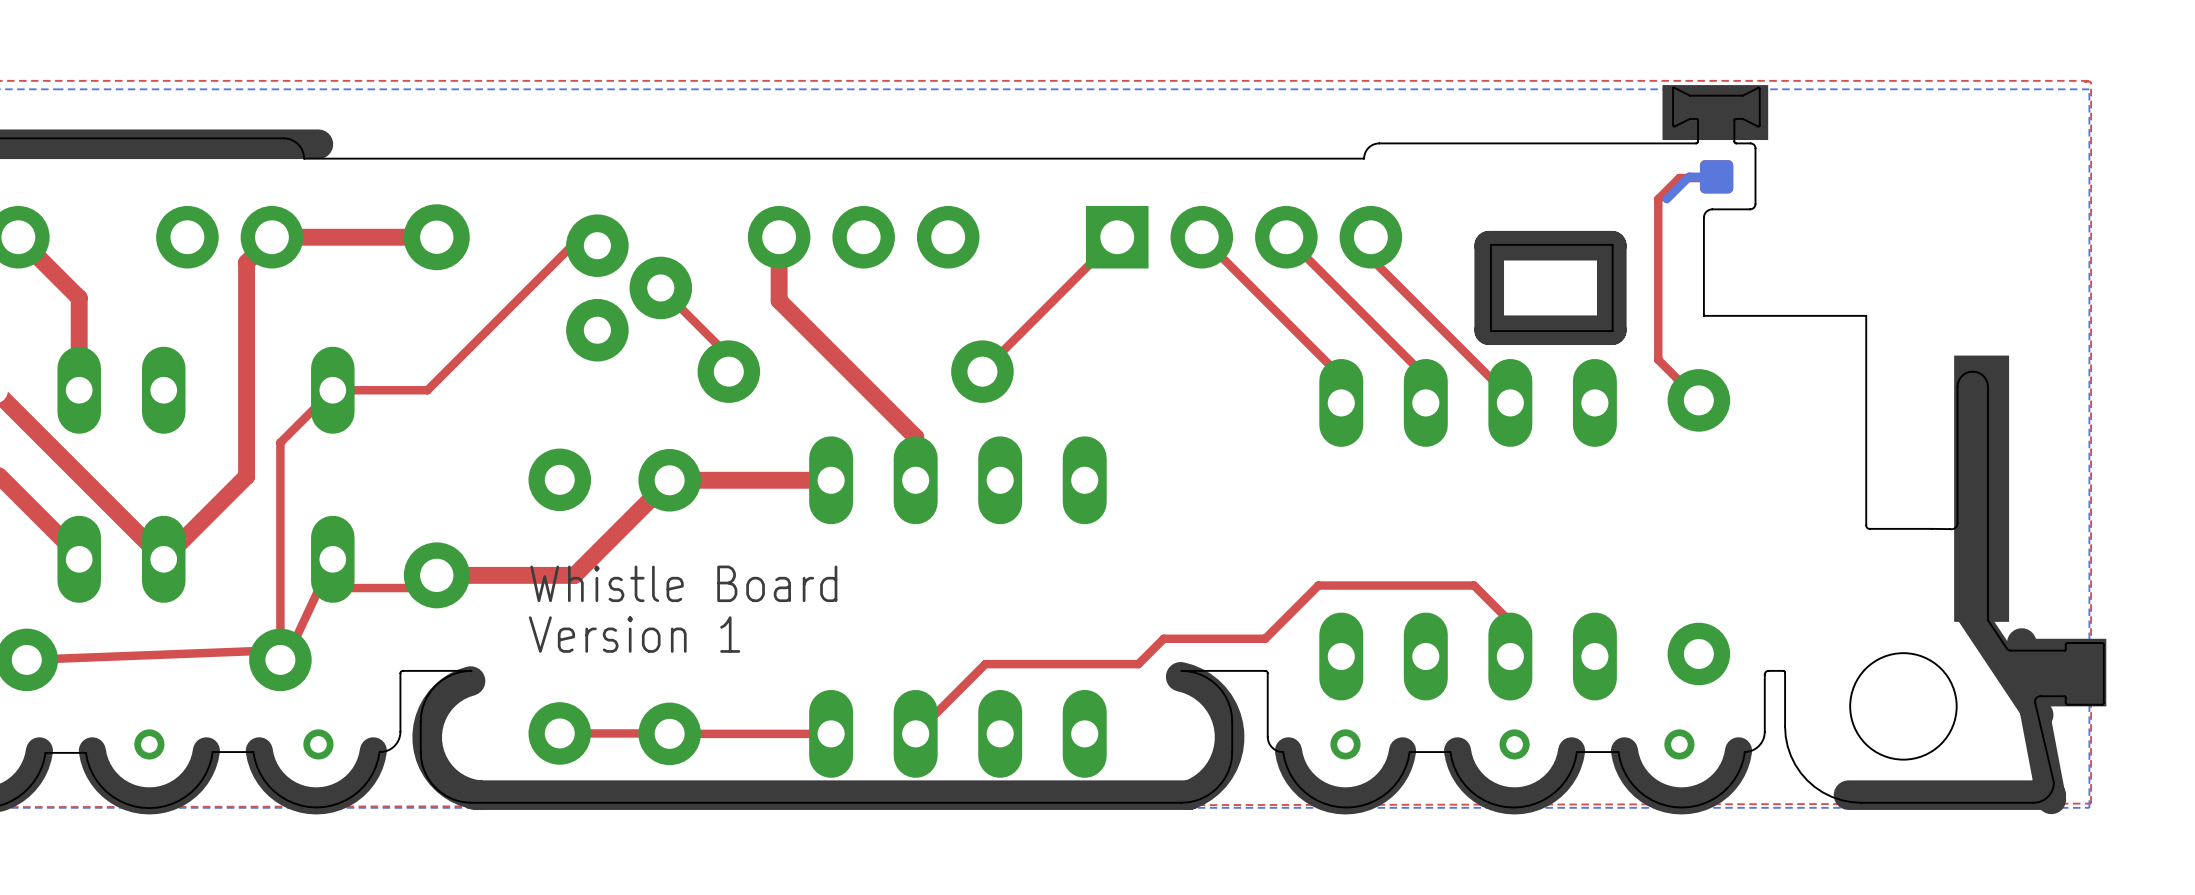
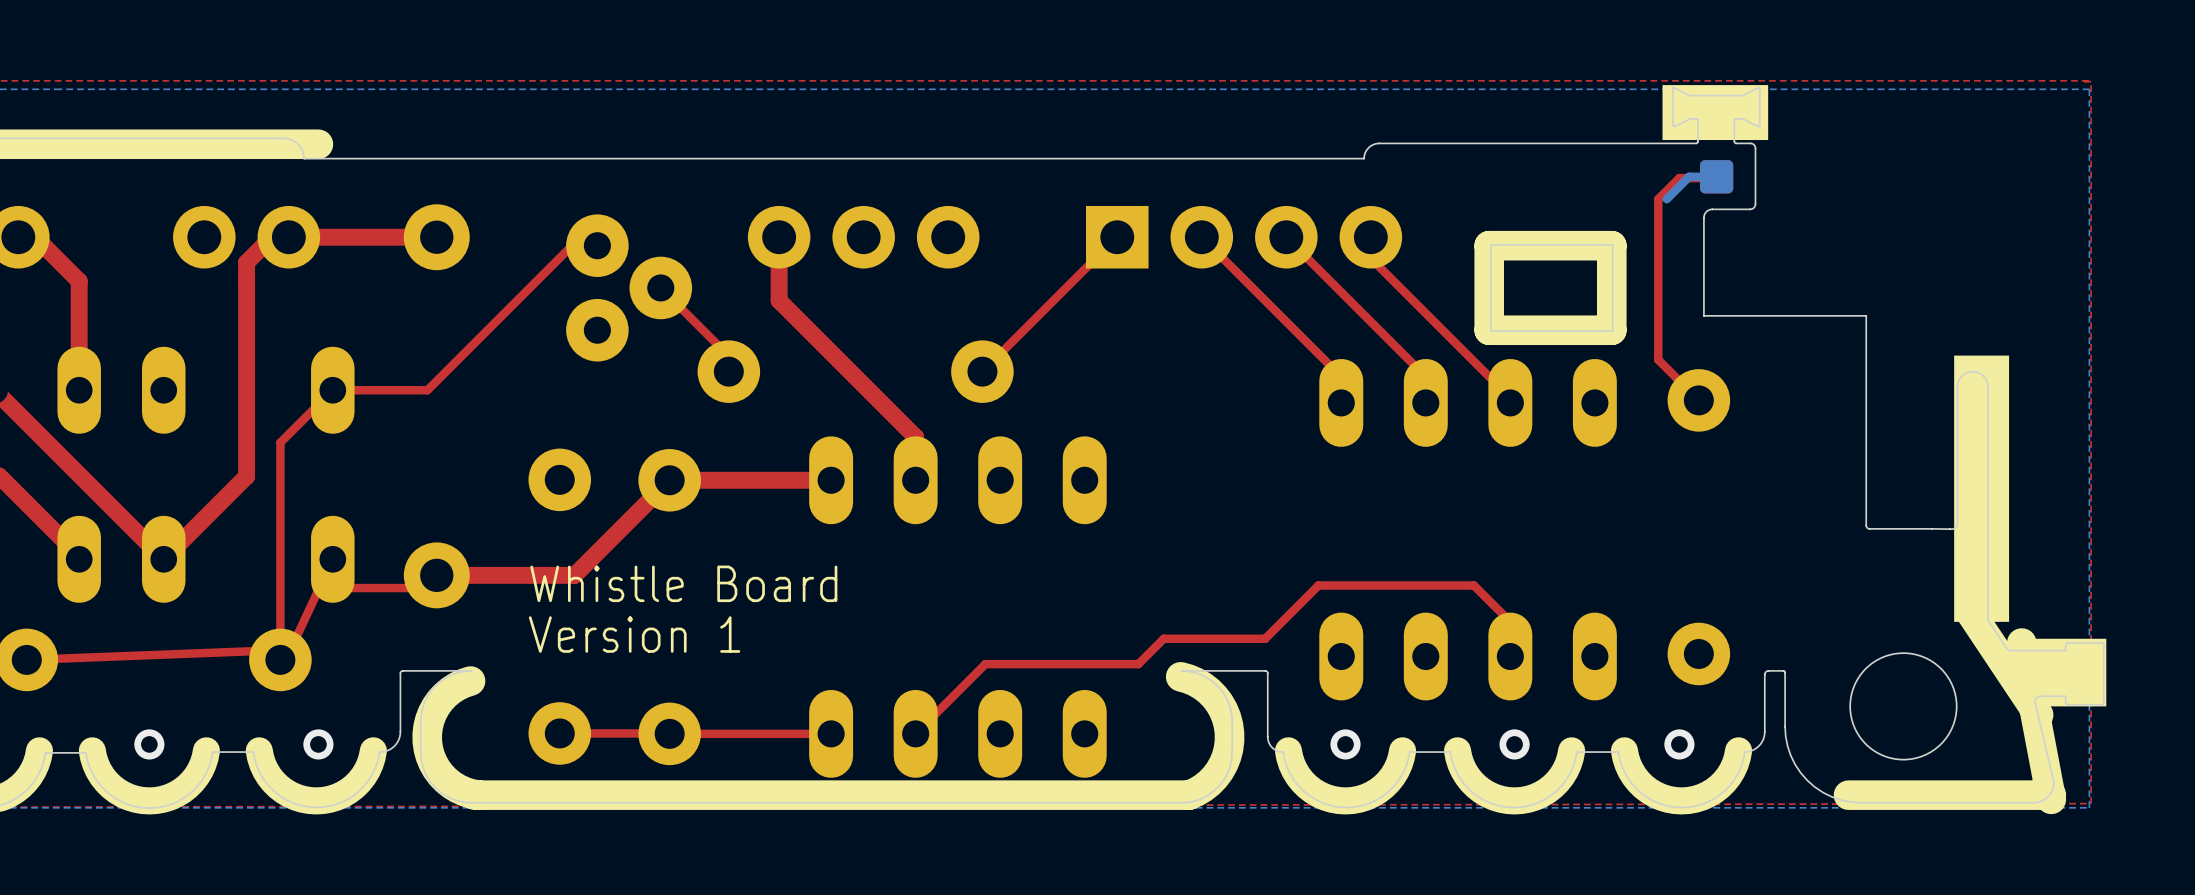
top track: (18, 237) (79, 298) -> (35, 237) (79, 281) (79, 298)
part position: (229, 237) -> (246, 237)

